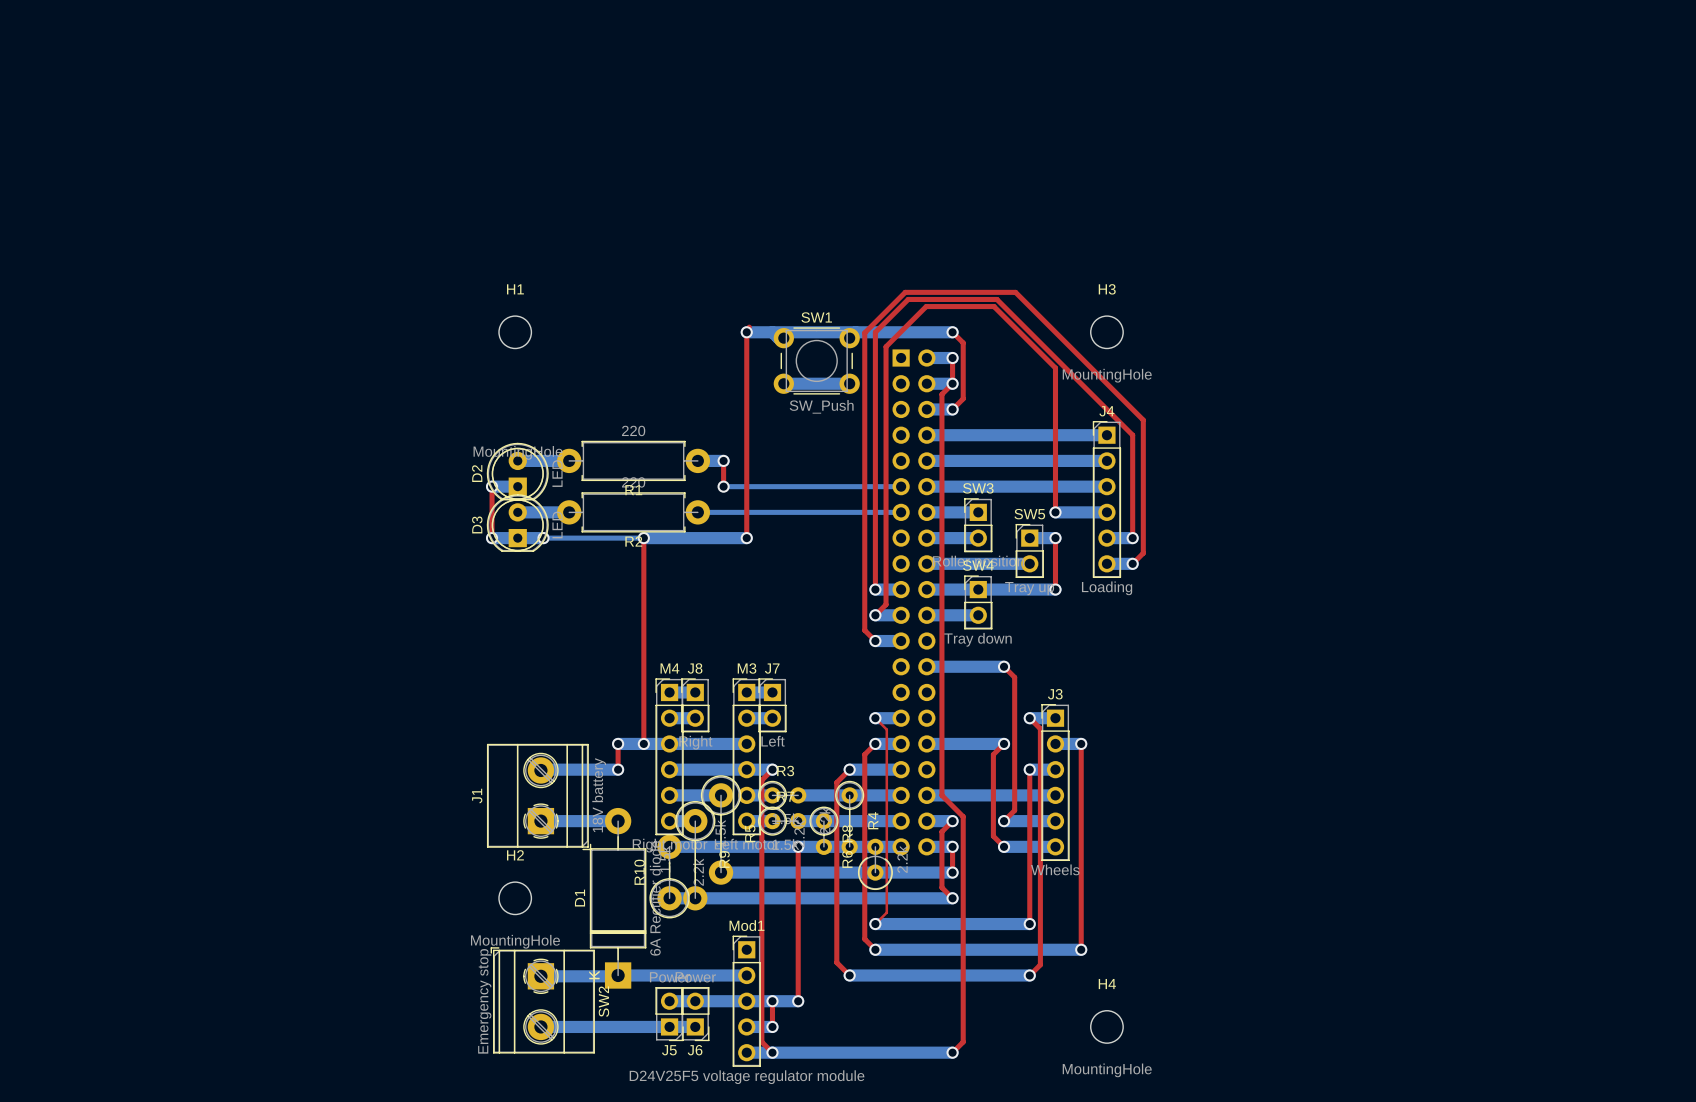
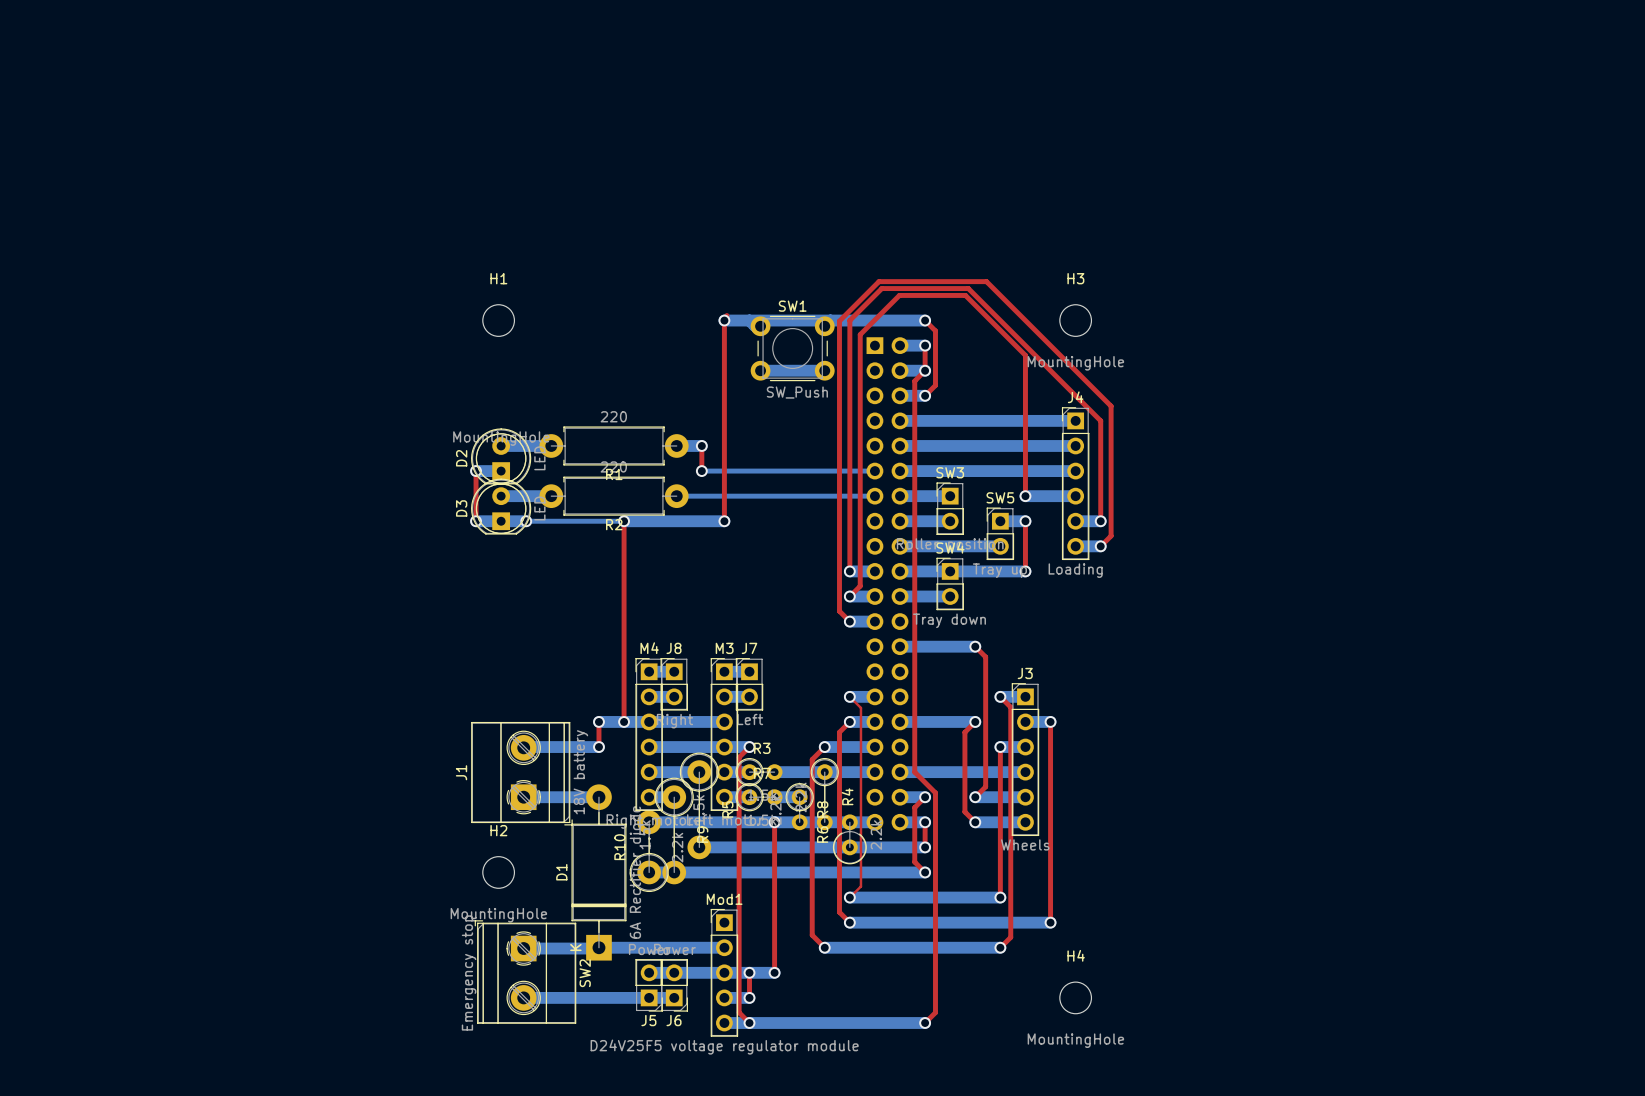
bottom track: (823, 821) (901, 821) -> none

